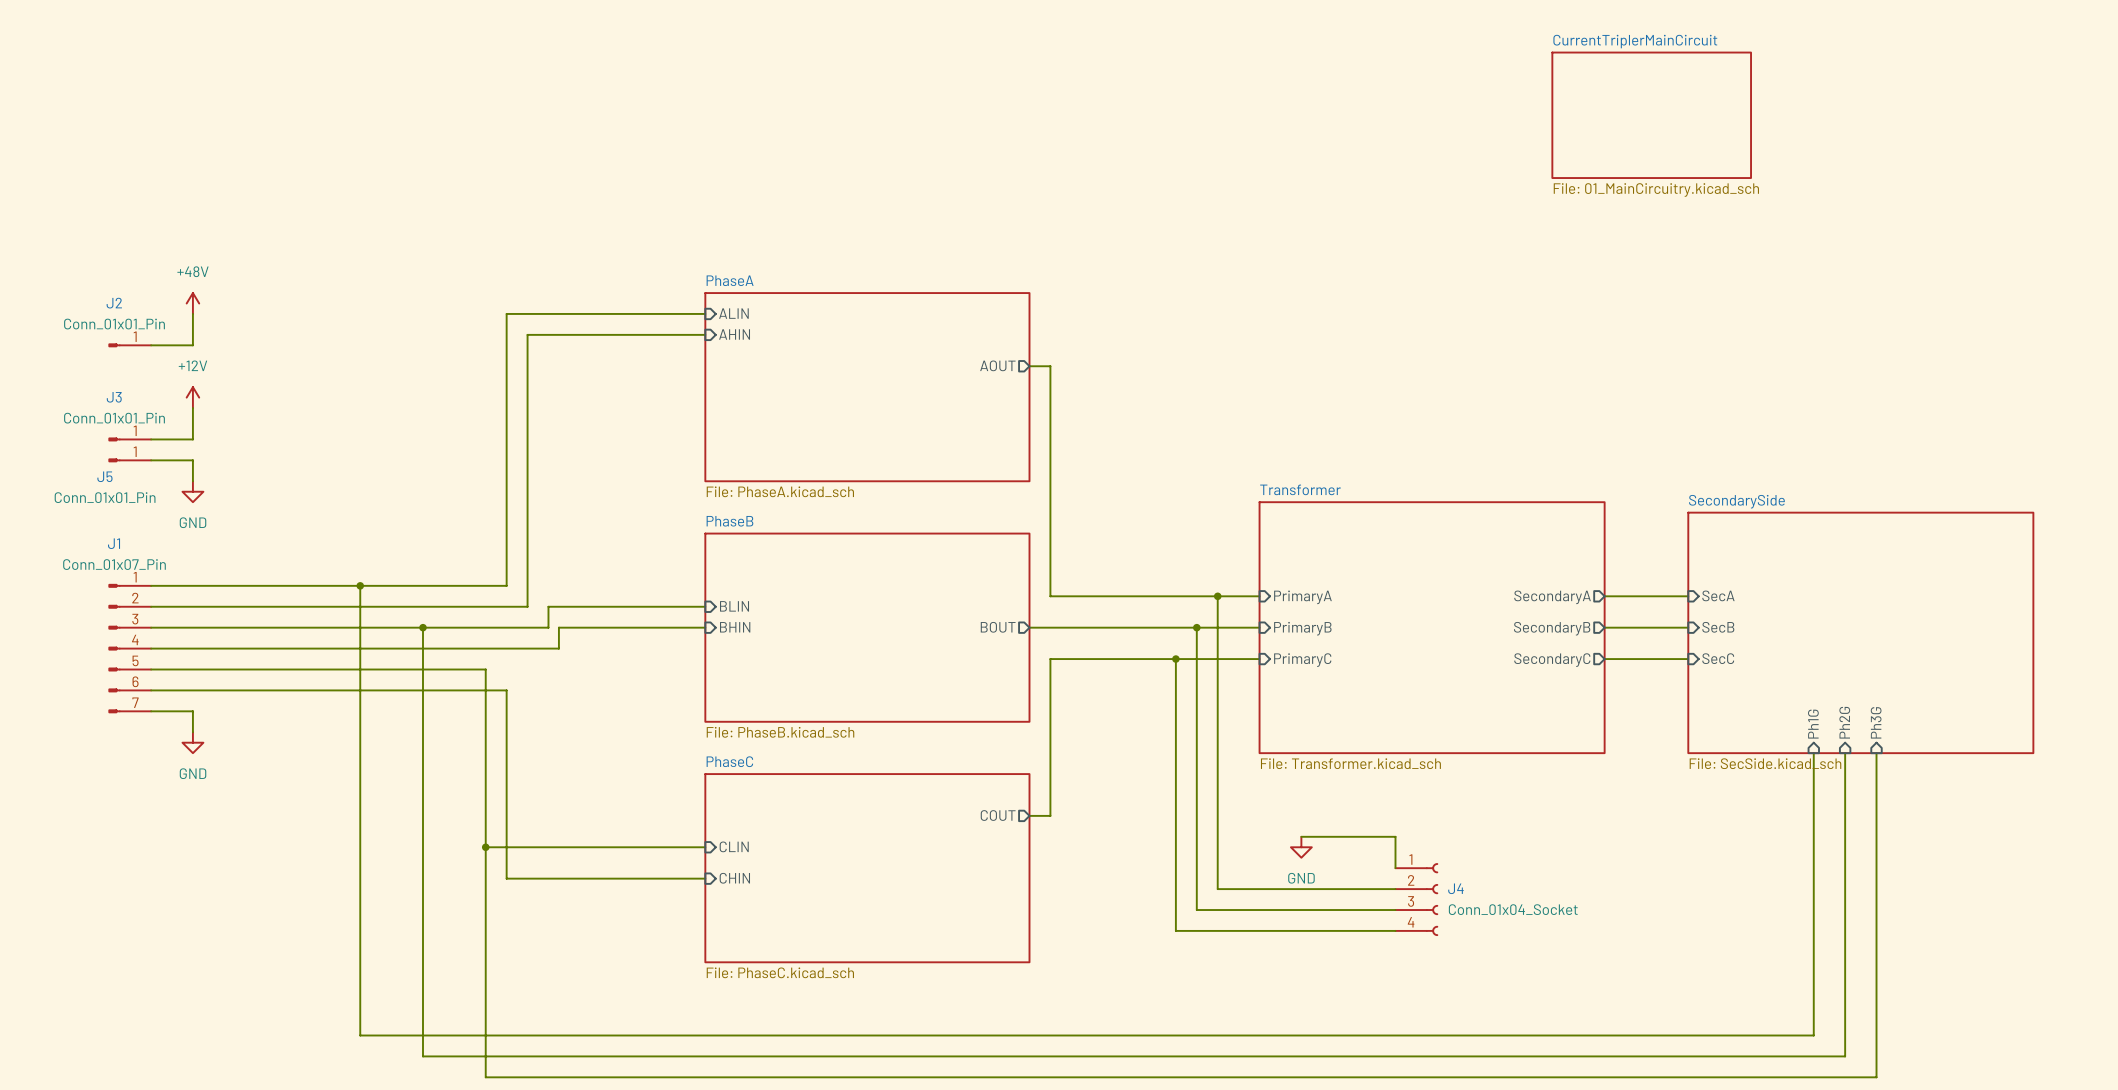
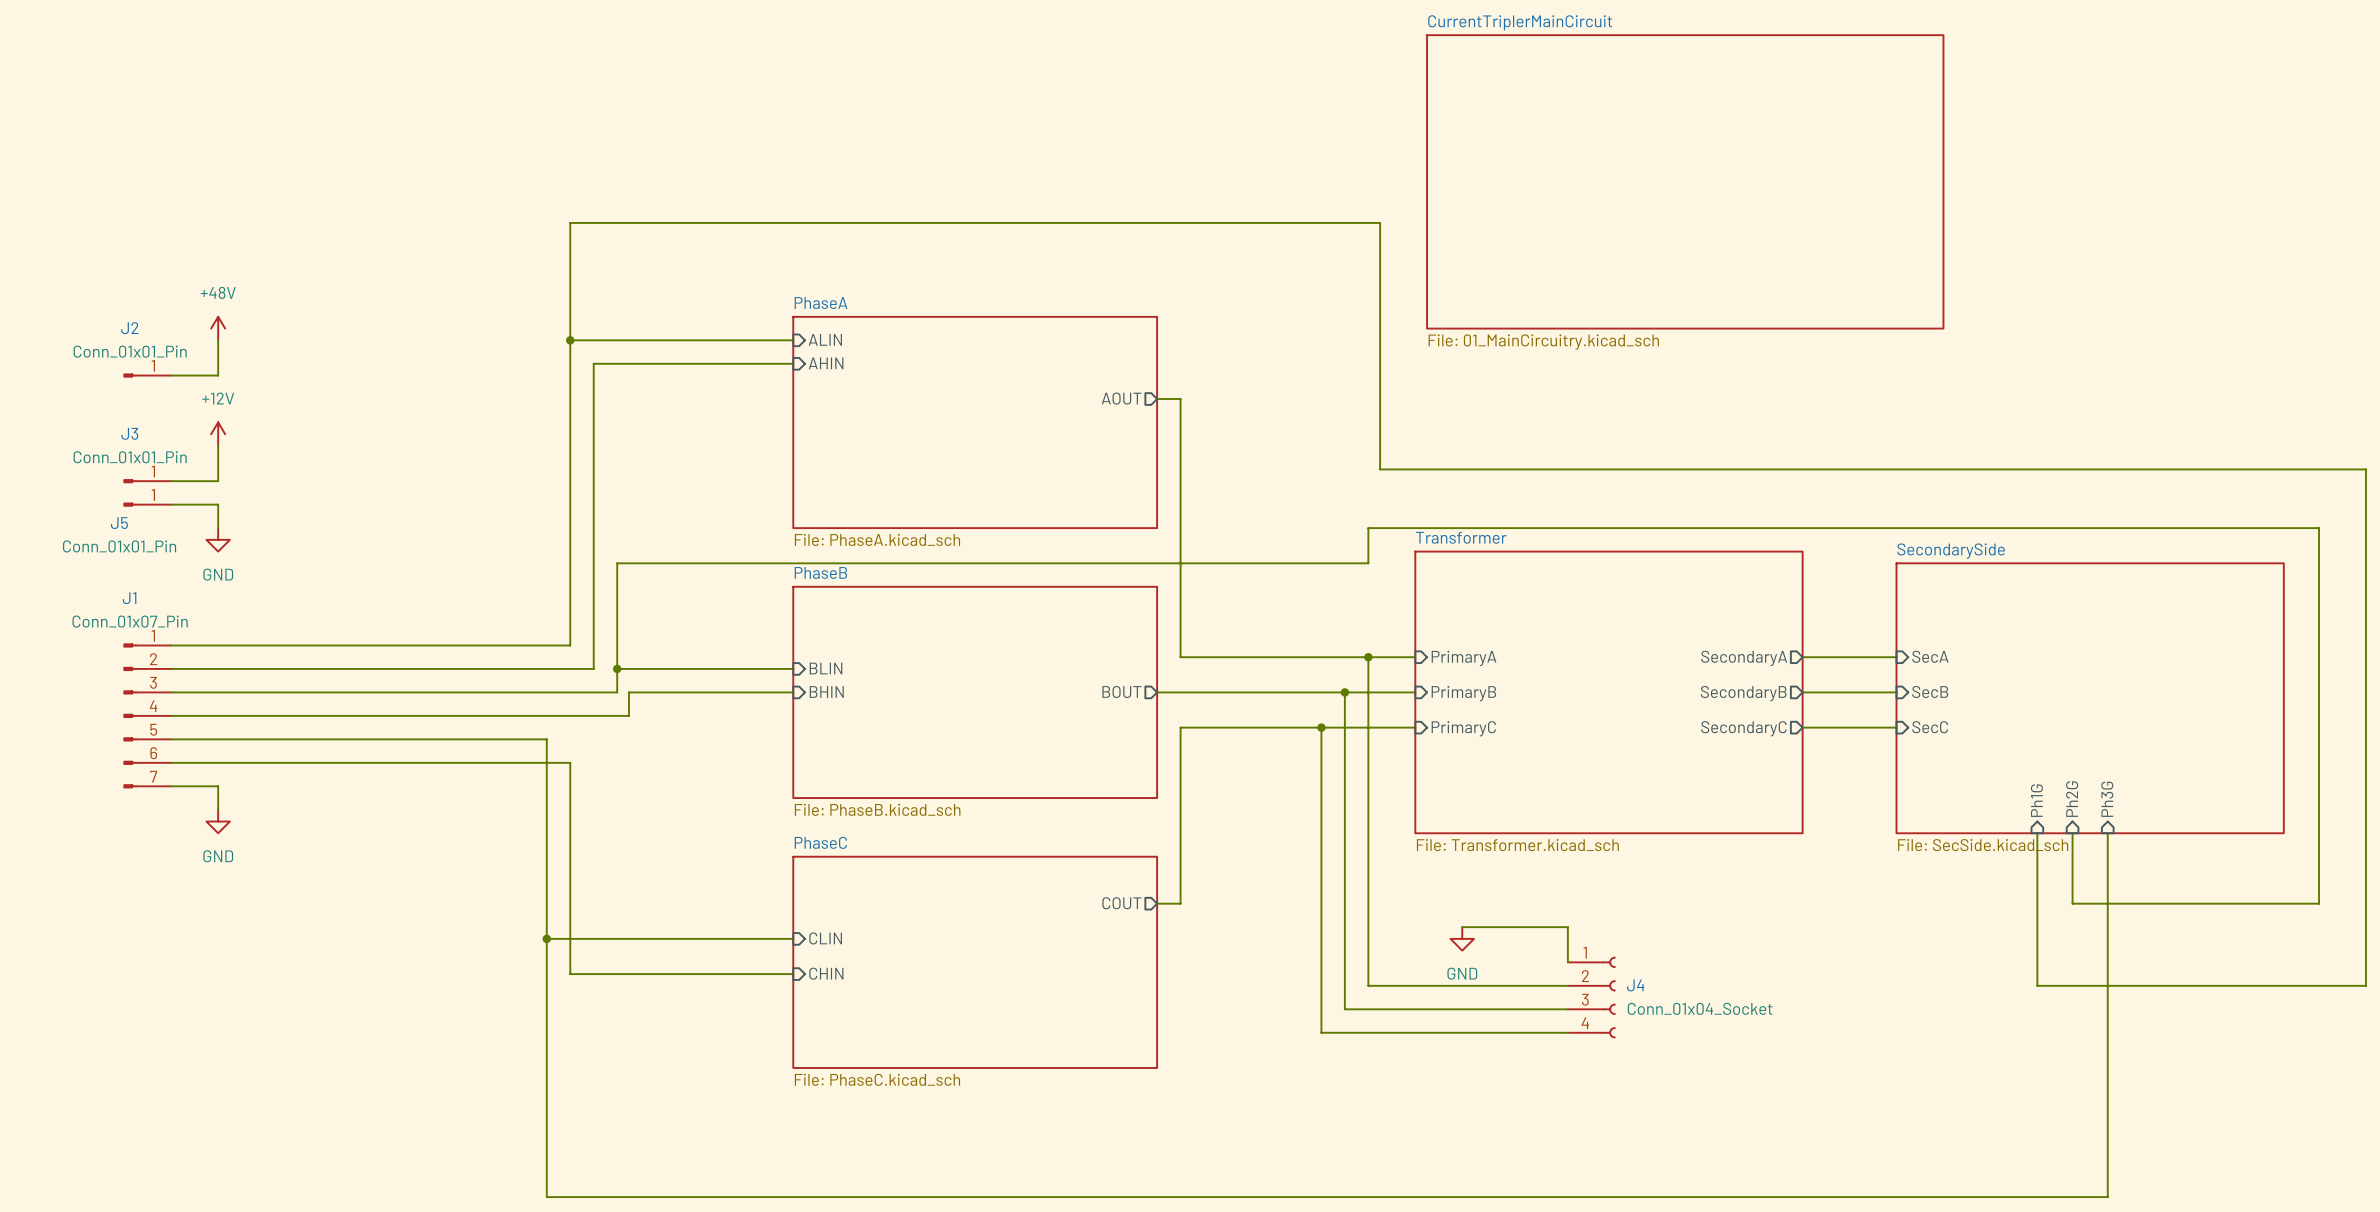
sheet CurrentTriplerMainCircuit: File: 01_MainCircuitry.kicad_sch (1651, 115) -> none
sheet CurrentTriplerMainCircuit: none -> File: 01_MainCircuitry.kicad_sch (1685, 181)
junction: none -> (570, 340)
wire: (360, 585) (360, 1035) (1813, 1035) (1813, 889) -> (570, 340) (570, 222) (1380, 222) (1380, 469) (2365, 469) (2365, 985) (2037, 985)
junction: (360, 585) -> none
junction: none -> (617, 668)
wire: (422, 627) (422, 1056) (1845, 1056) (1845, 815) -> (617, 668) (617, 563) (1368, 563) (1368, 528) (2319, 528) (2319, 903) (2072, 903)
junction: (422, 627) -> none

